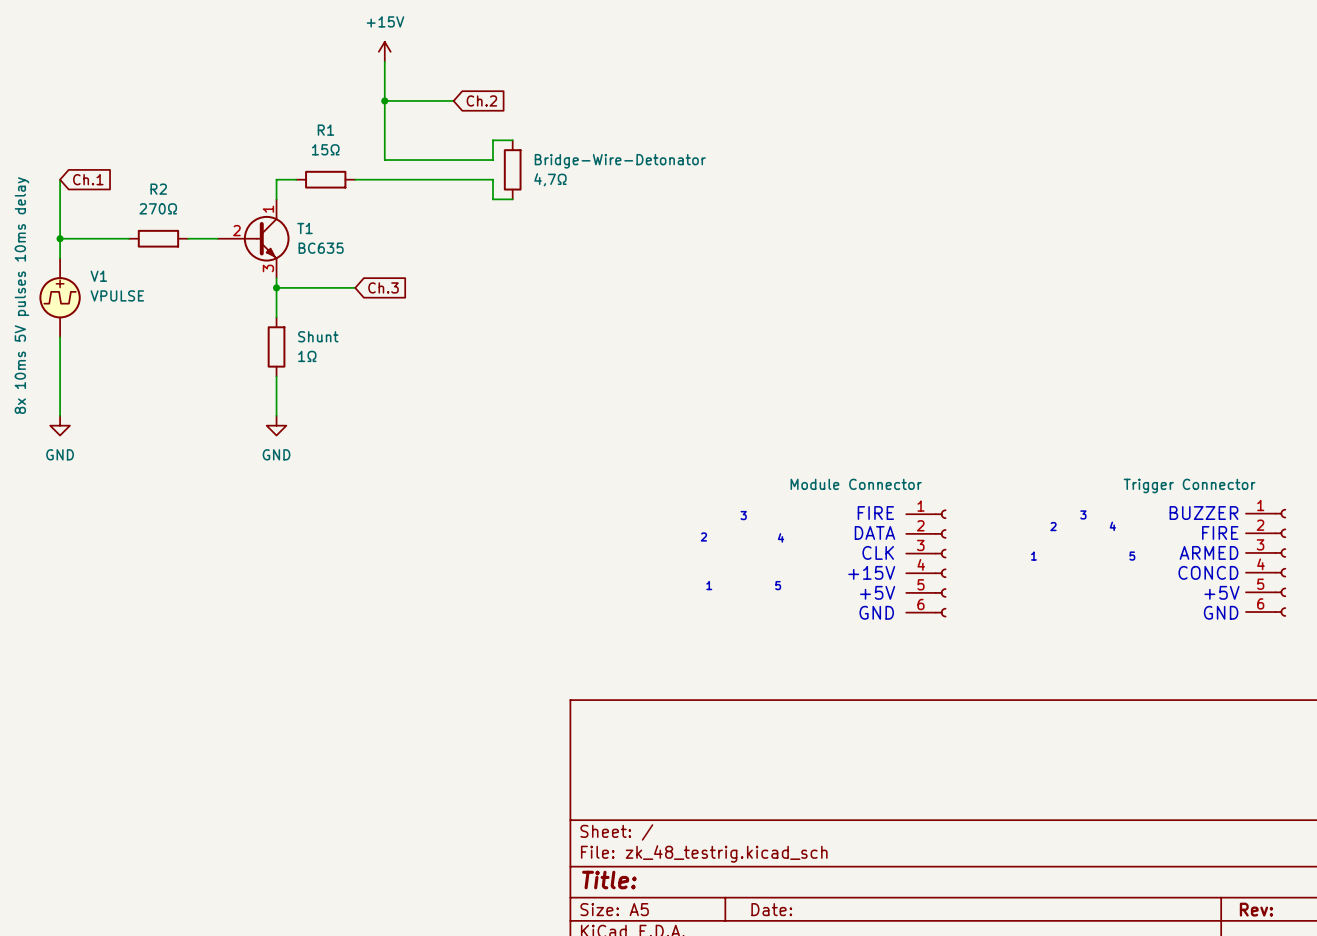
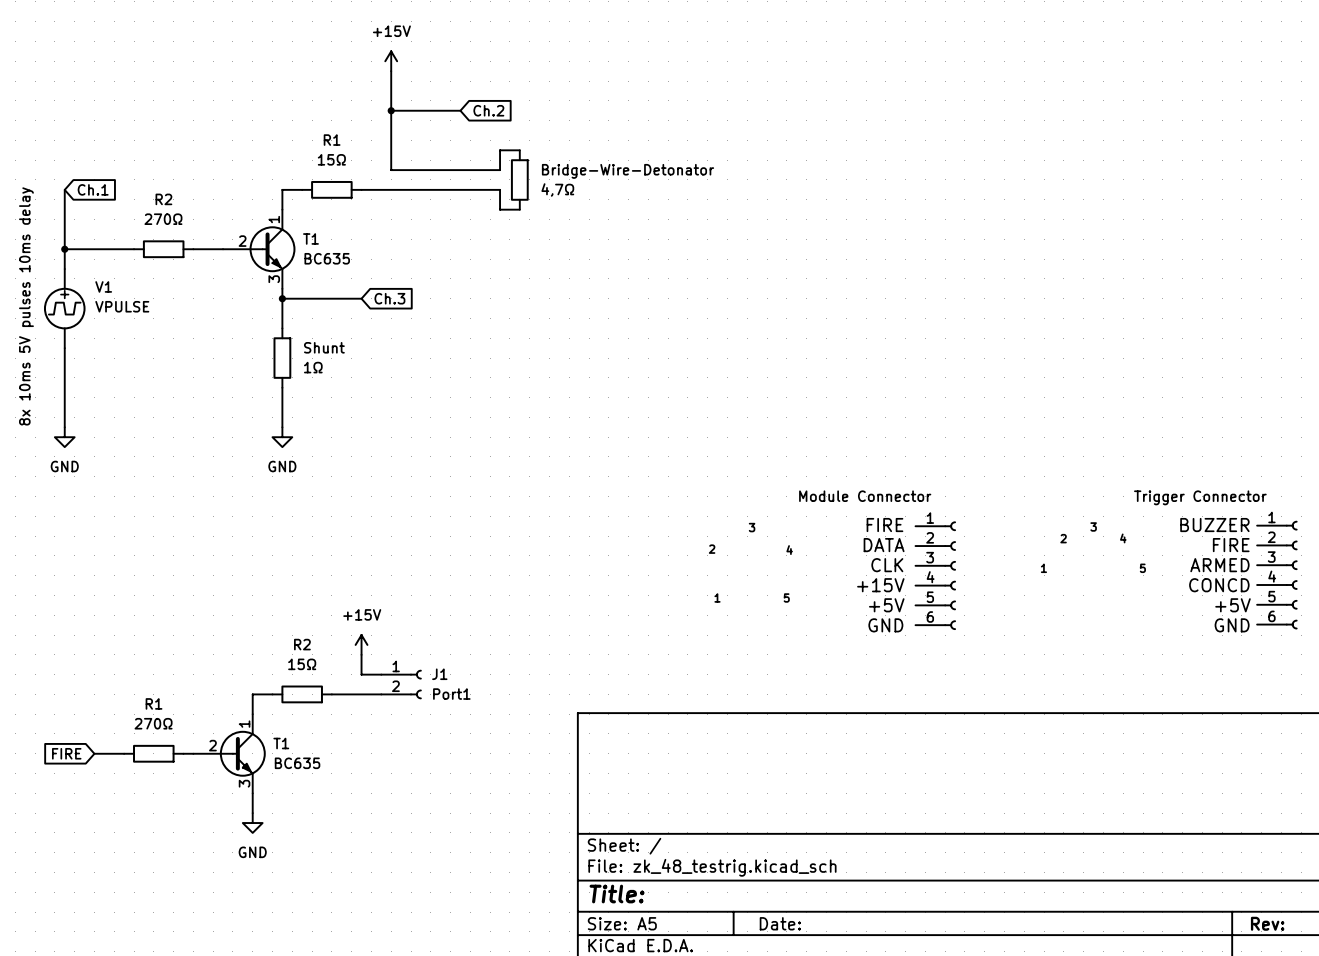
power symbol: none -> +15V (361, 644)
wire: none -> (361, 654) (361, 674) (381, 674)
J1: none -> Port1 (401, 684)
wire: none -> (272, 694) (252, 694) (252, 714)
R2: none -> 15Ω (302, 694)
wire: none -> (331, 694) (381, 694)
global label: none -> FIRE (66, 753)
wire: none -> (94, 753) (124, 753)
R1: none -> 270Ω (153, 753)
wire: none -> (183, 753) (193, 753)
T1: none -> BC635 (229, 753)
wire: none -> (252, 793) (252, 813)
power symbol: none -> GND (252, 823)

